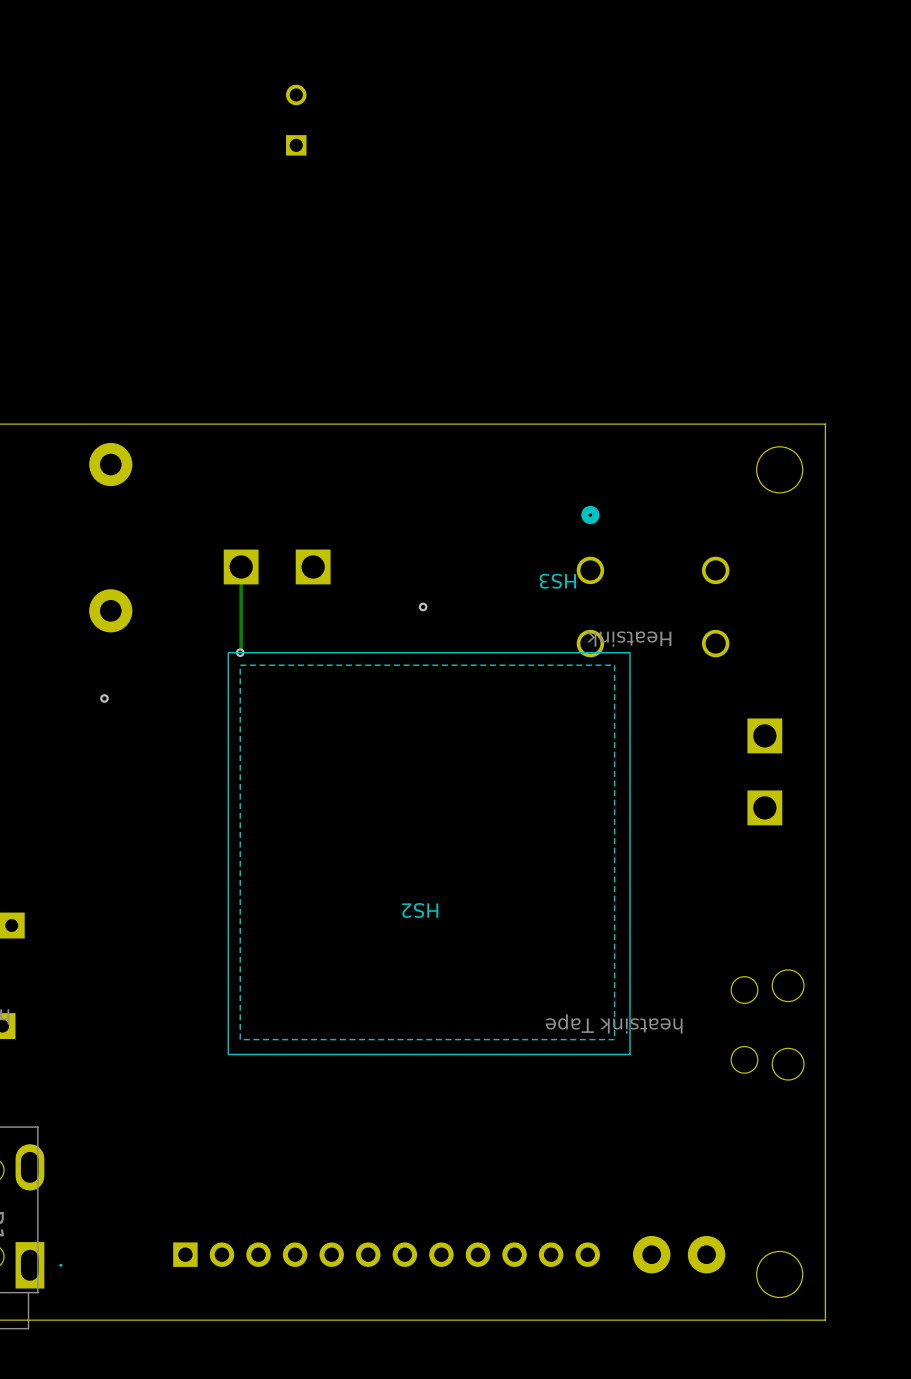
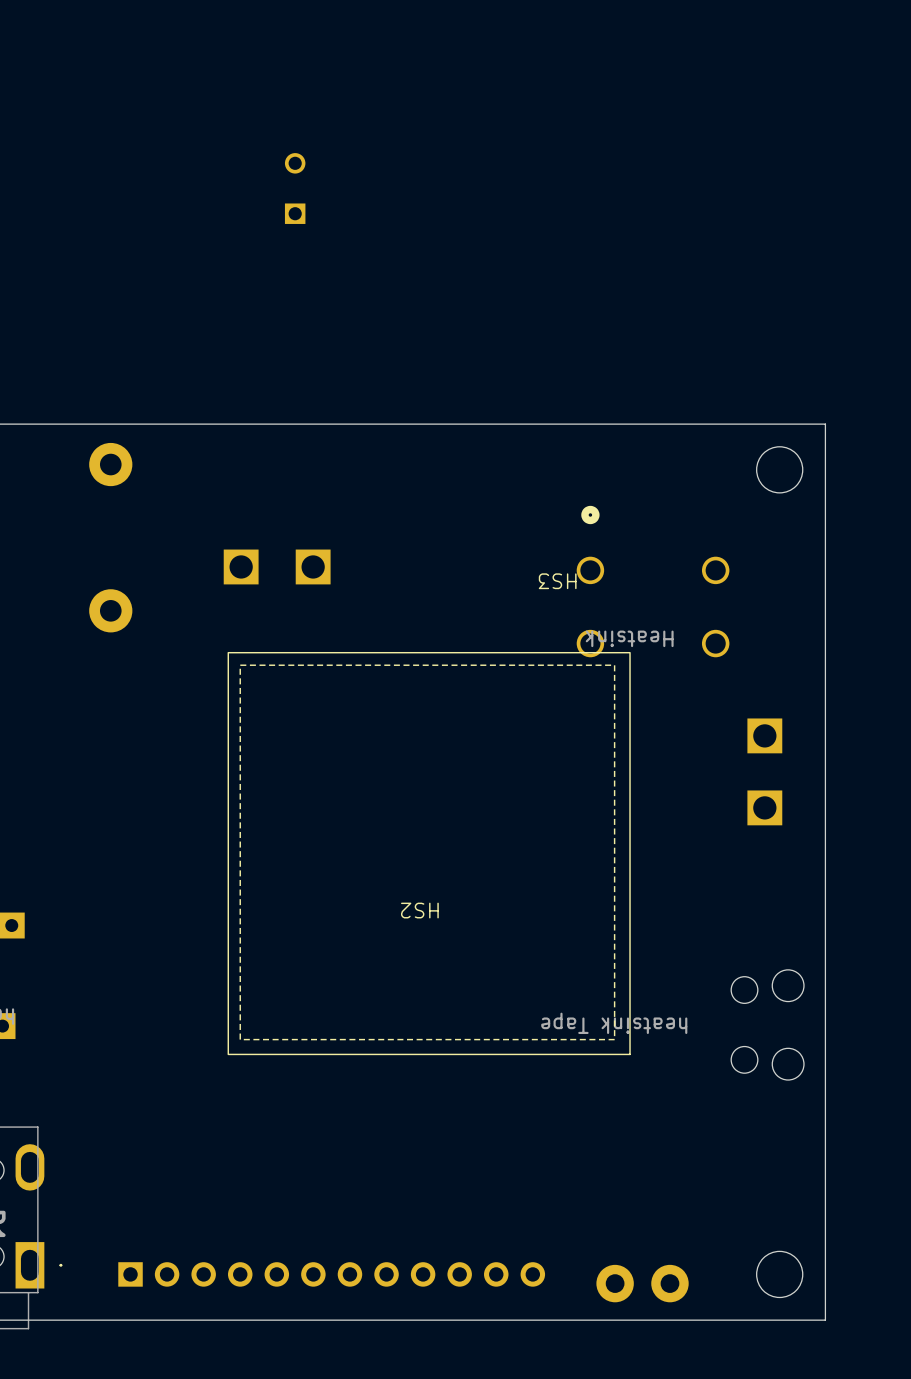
part position: (296, 120) -> (295, 188)
track: (241, 566) (240, 652) -> none
via: (423, 606) -> none
via: (240, 652) -> none
via: (104, 698) -> none
part position: (386, 1254) -> (331, 1274)
part position: (679, 1254) -> (642, 1283)

